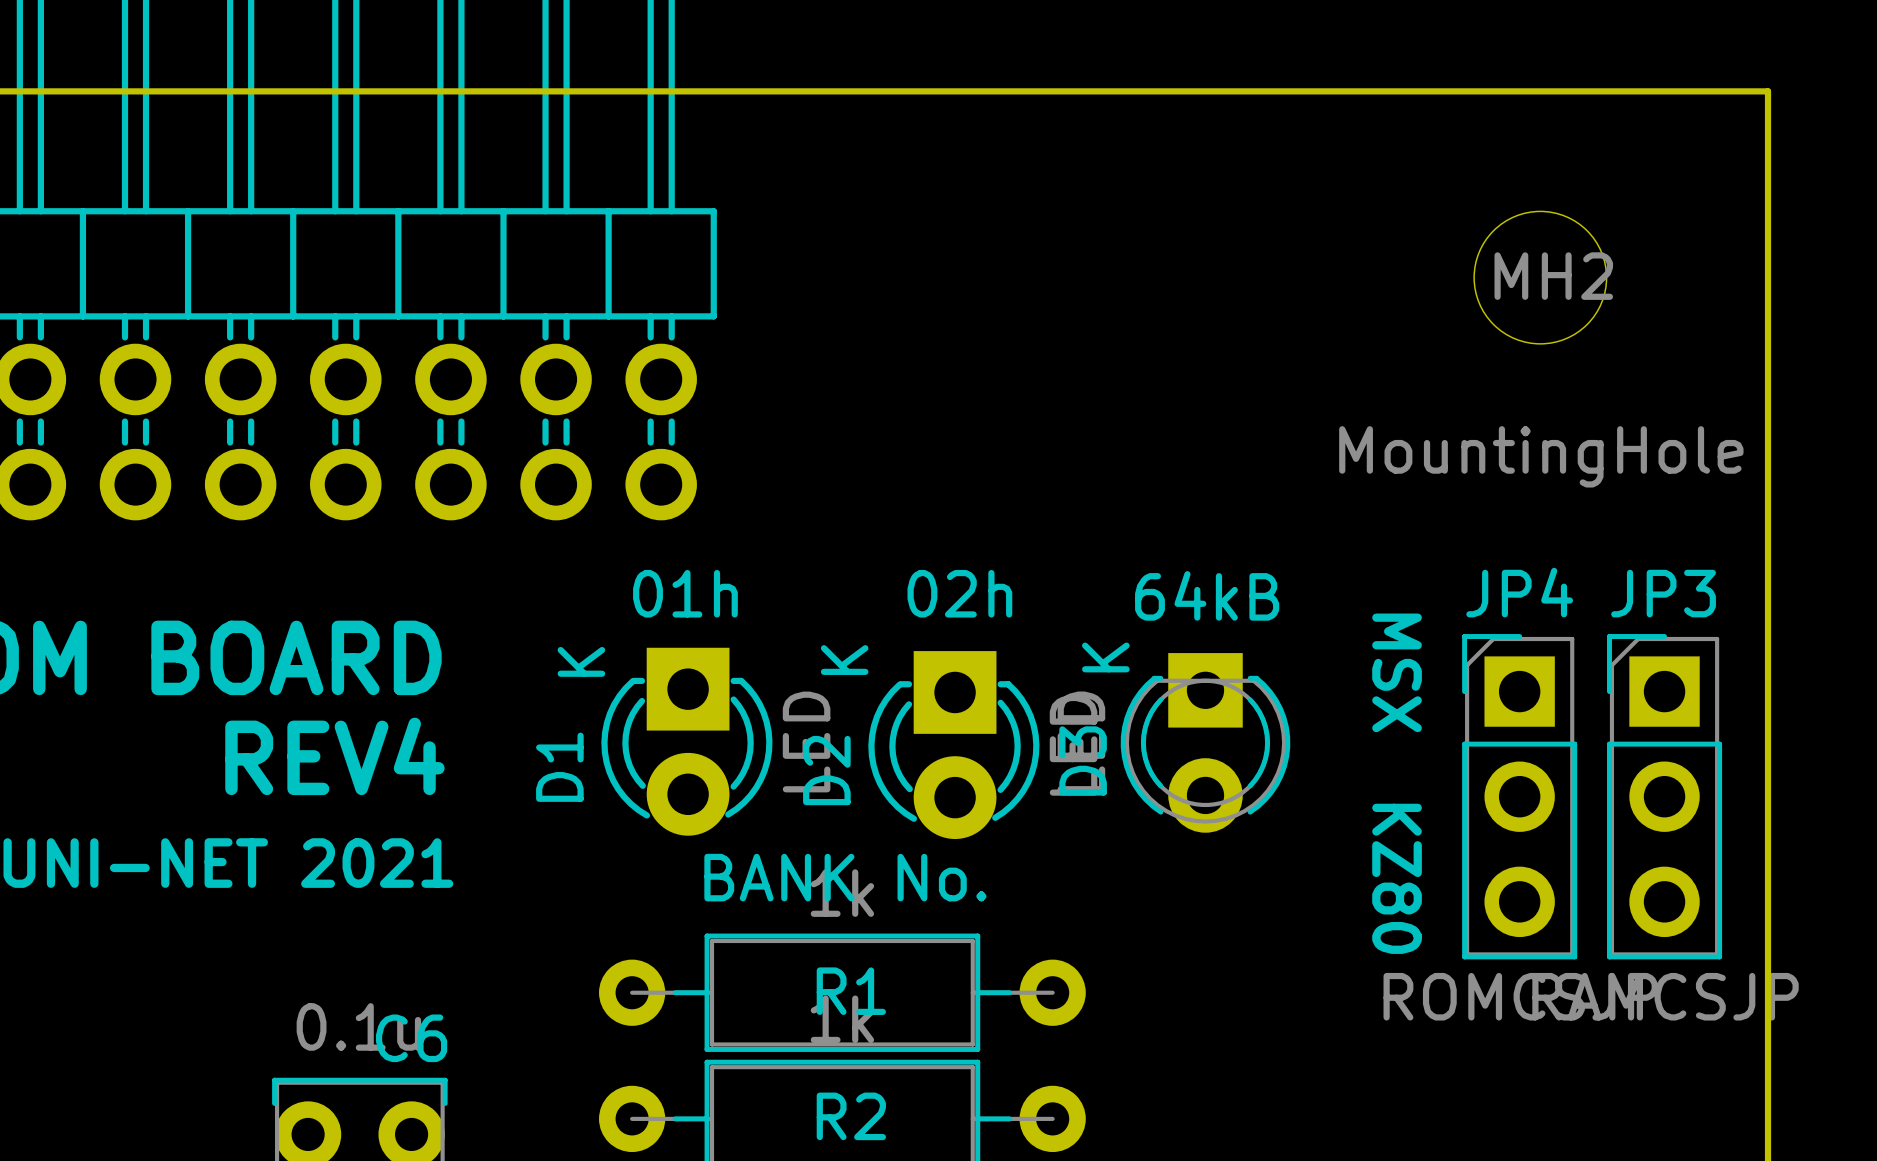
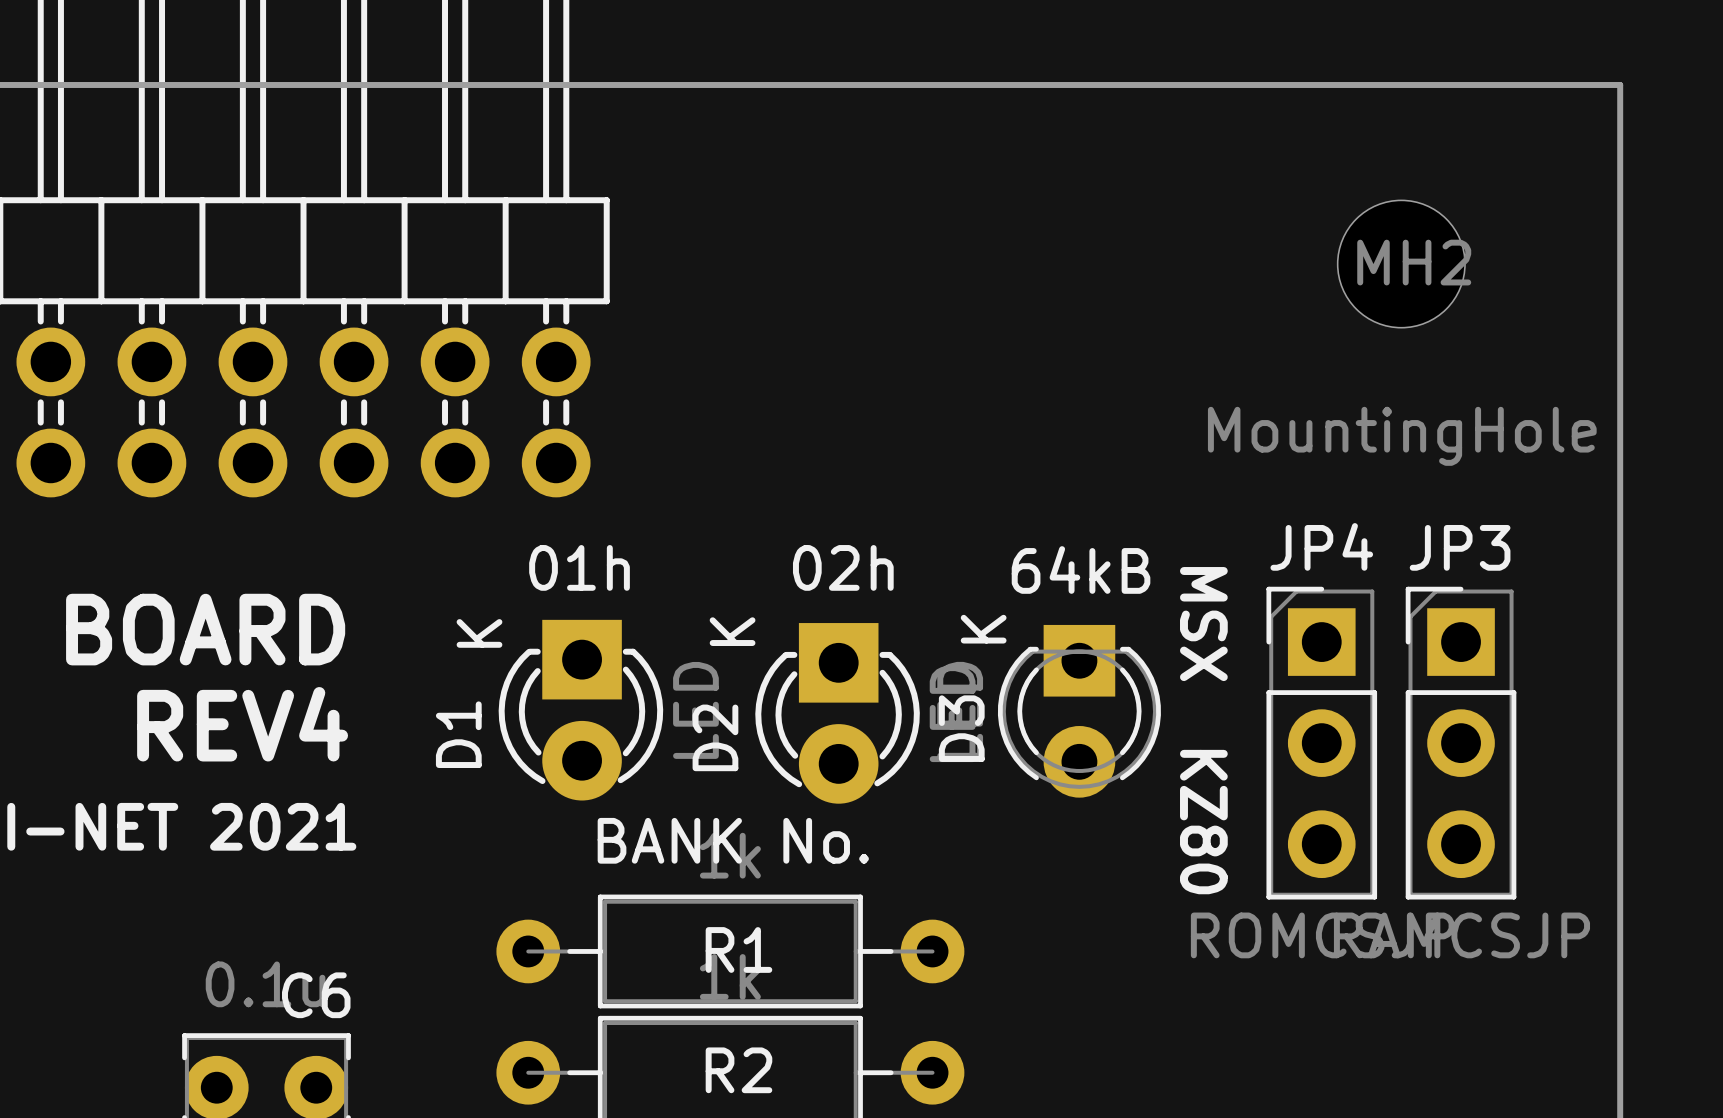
text position: MSX (1397, 672) -> MSX (1203, 624)
JP4 position: (1519, 796) -> (1321, 743)
JP3 position: (1664, 796) -> (1461, 743)
text position: KZ80 (1397, 878) -> KZ80 (1203, 822)

